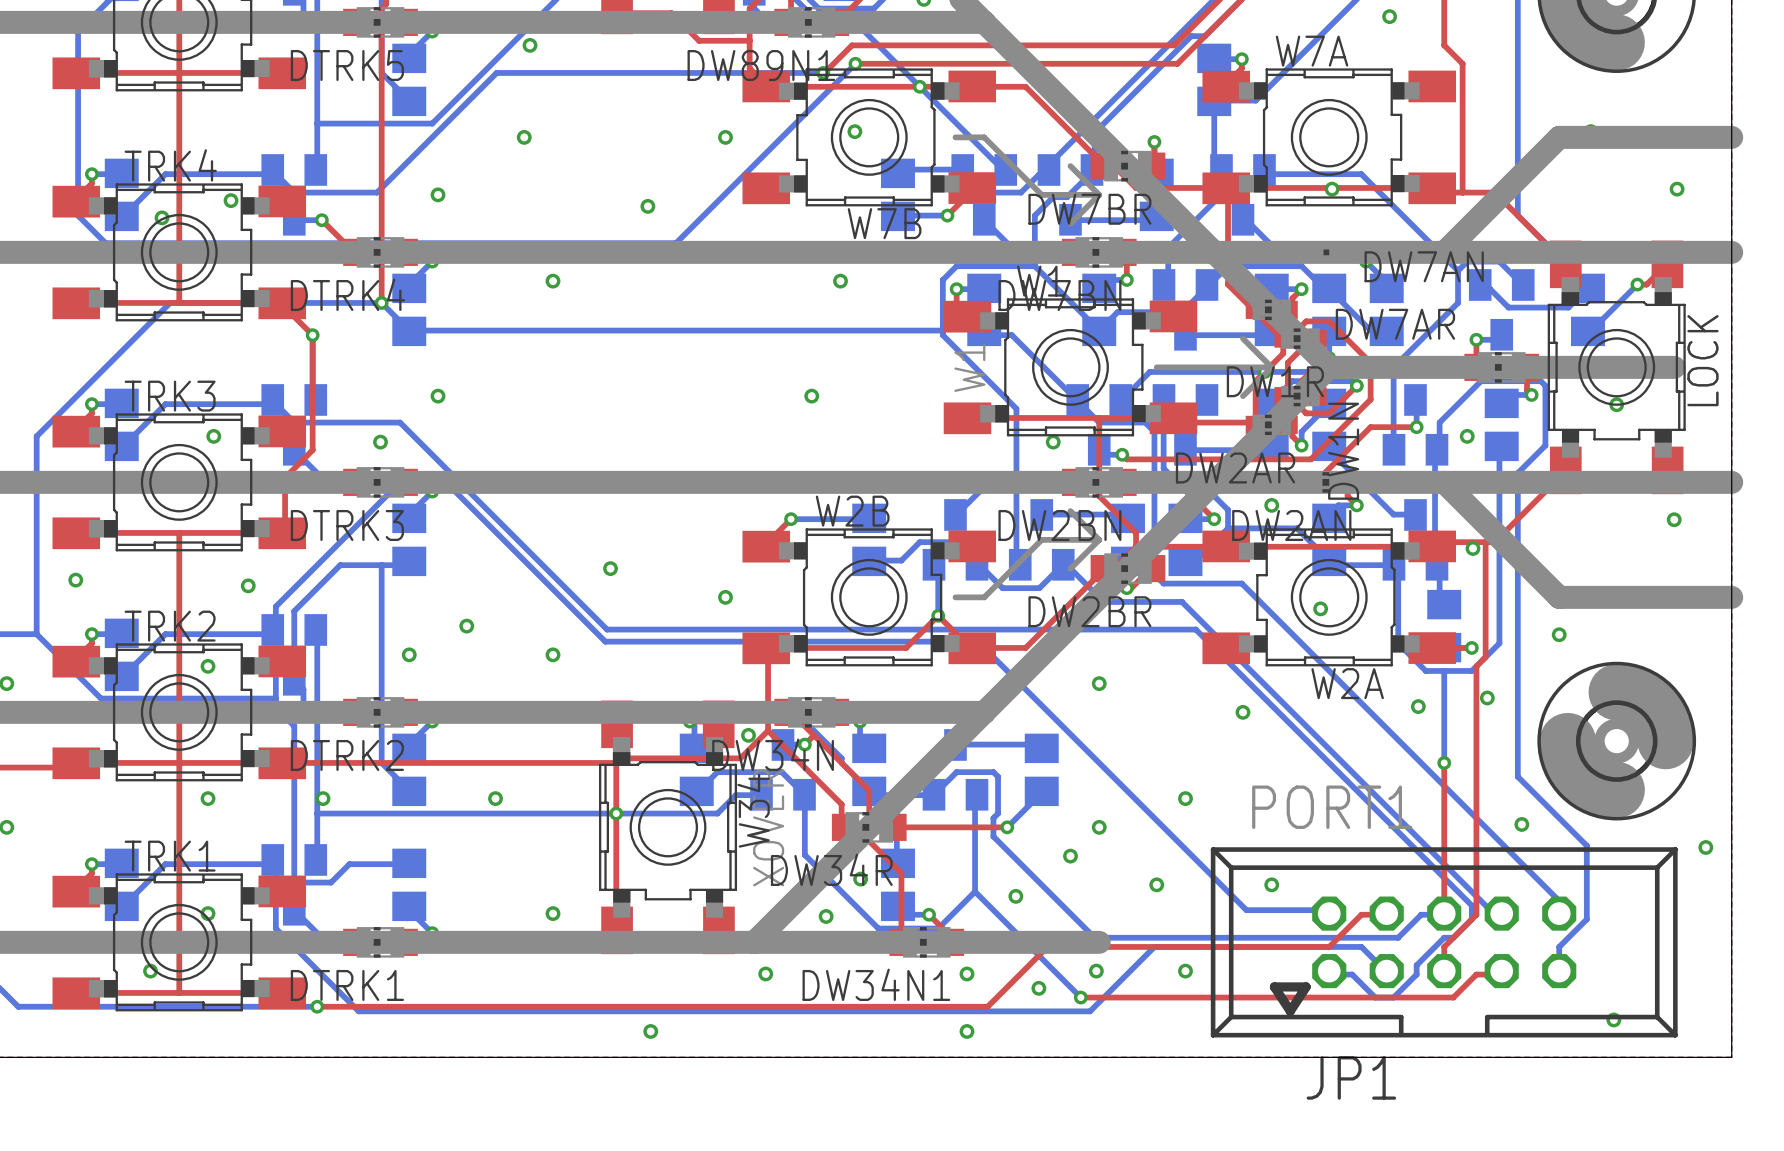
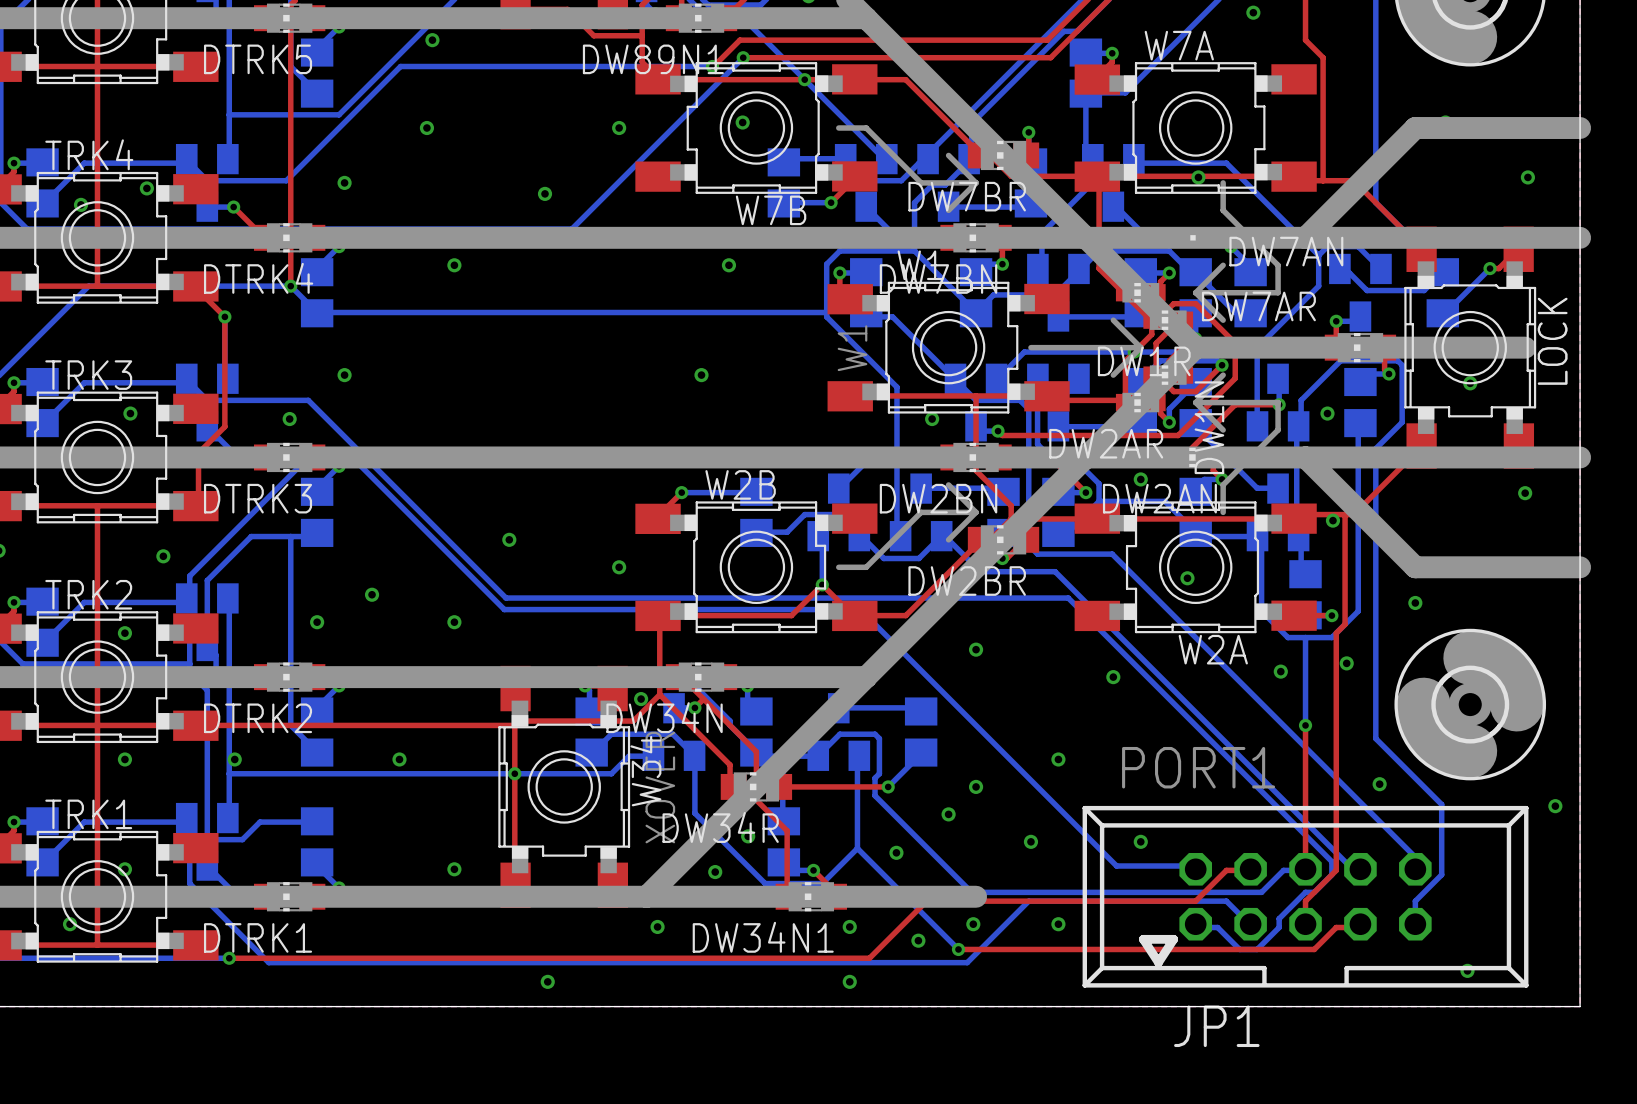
line: none -> (1223, 182) (1223, 210) (1278, 265) (1278, 292) (1195, 292)
line: none -> (1223, 265) (1195, 292)
line: none -> (1195, 292) (1223, 320)
line: none -> (1223, 375) (1195, 402)
line: none -> (1195, 402) (1278, 402) (1278, 430) (1223, 484) (1223, 512)
line: none -> (1195, 402) (1223, 430)

